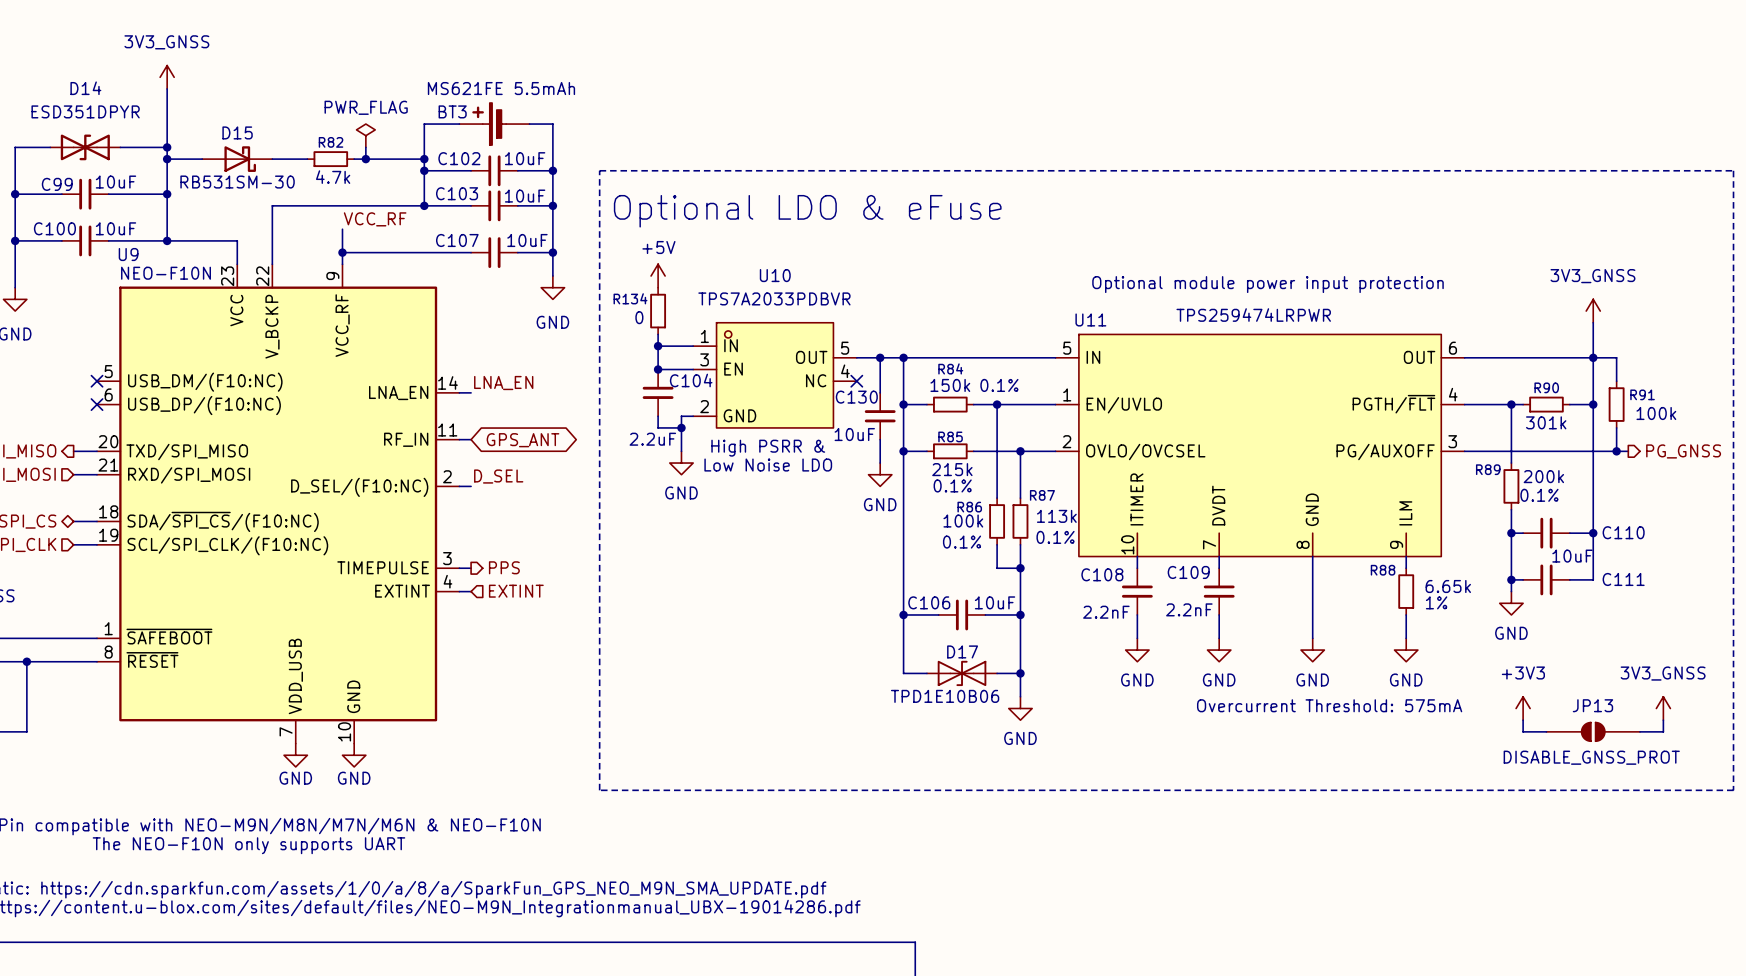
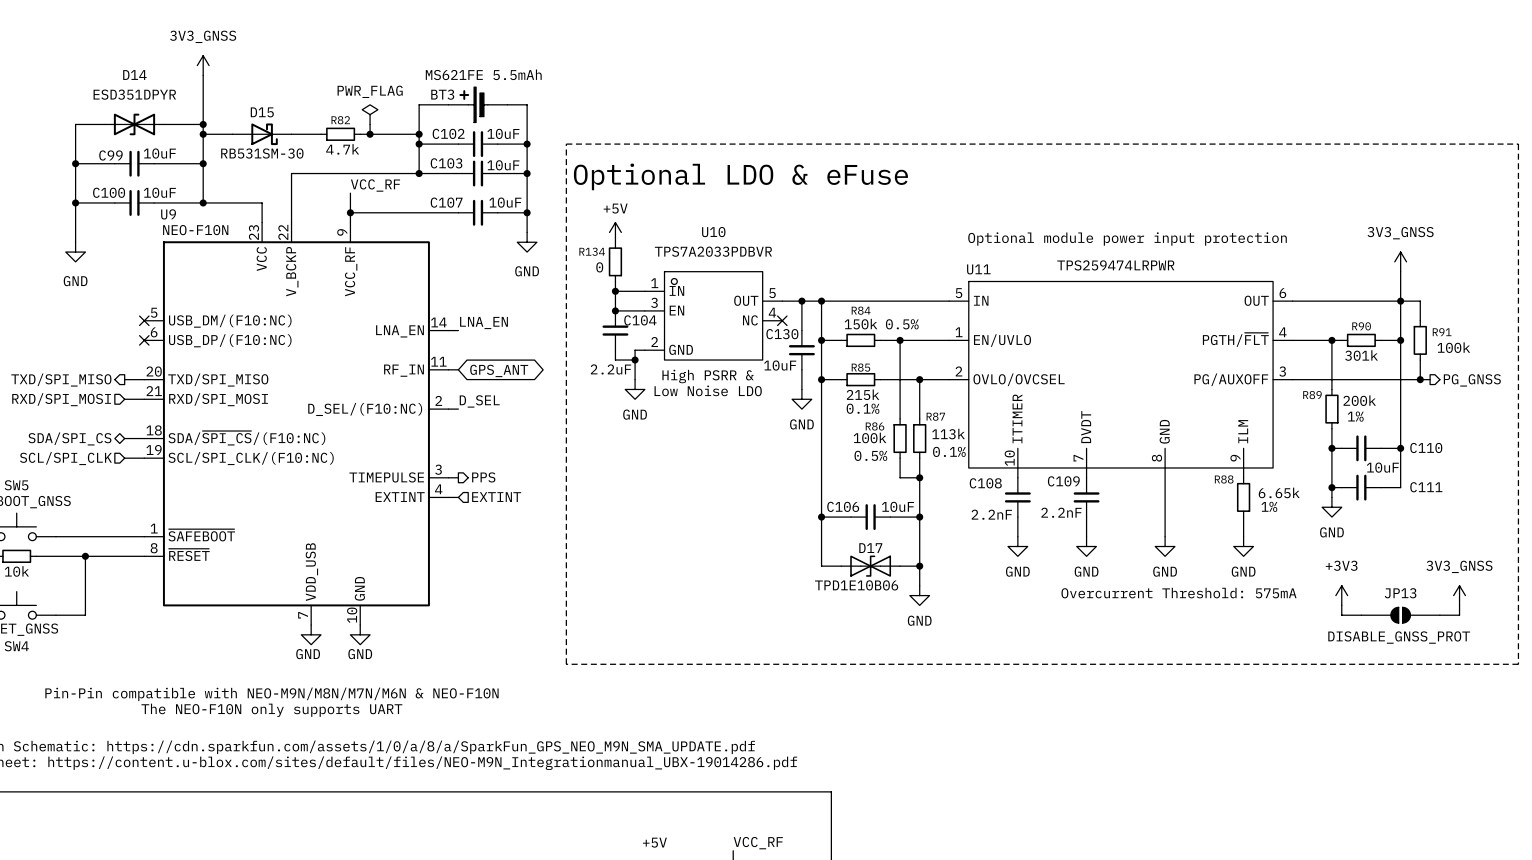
R84 text: 0.1% (999, 385) -> 0.5% (902, 324)
R89 text: 0.1% (1539, 495) -> 1% (1355, 416)
R86 text: 0.1% (962, 542) -> 0.5% (870, 455)

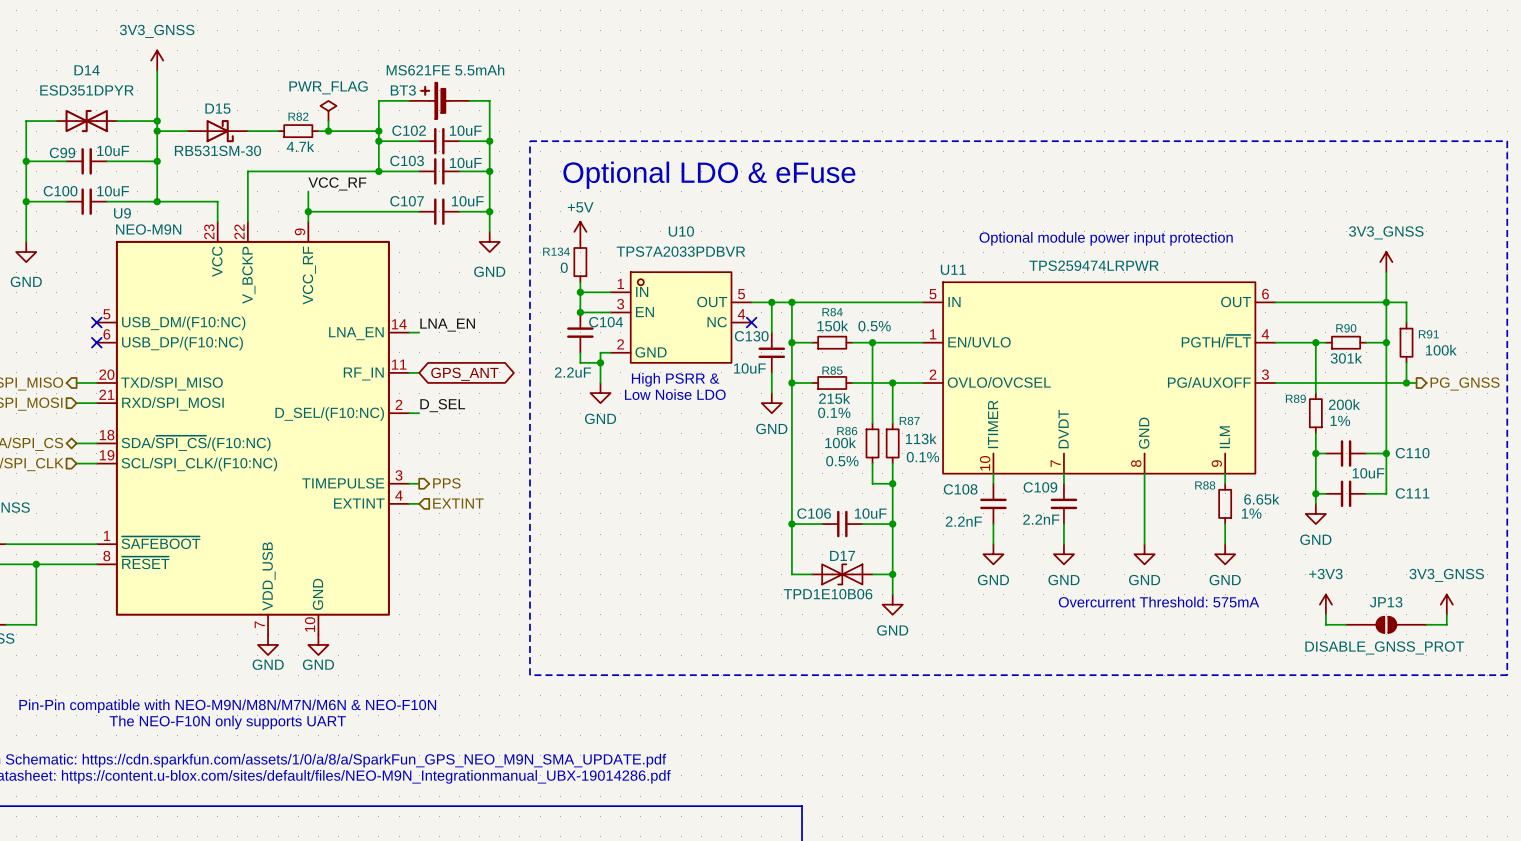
U9 value: NEO-F10N (195, 230) -> NEO-M9N (148, 229)

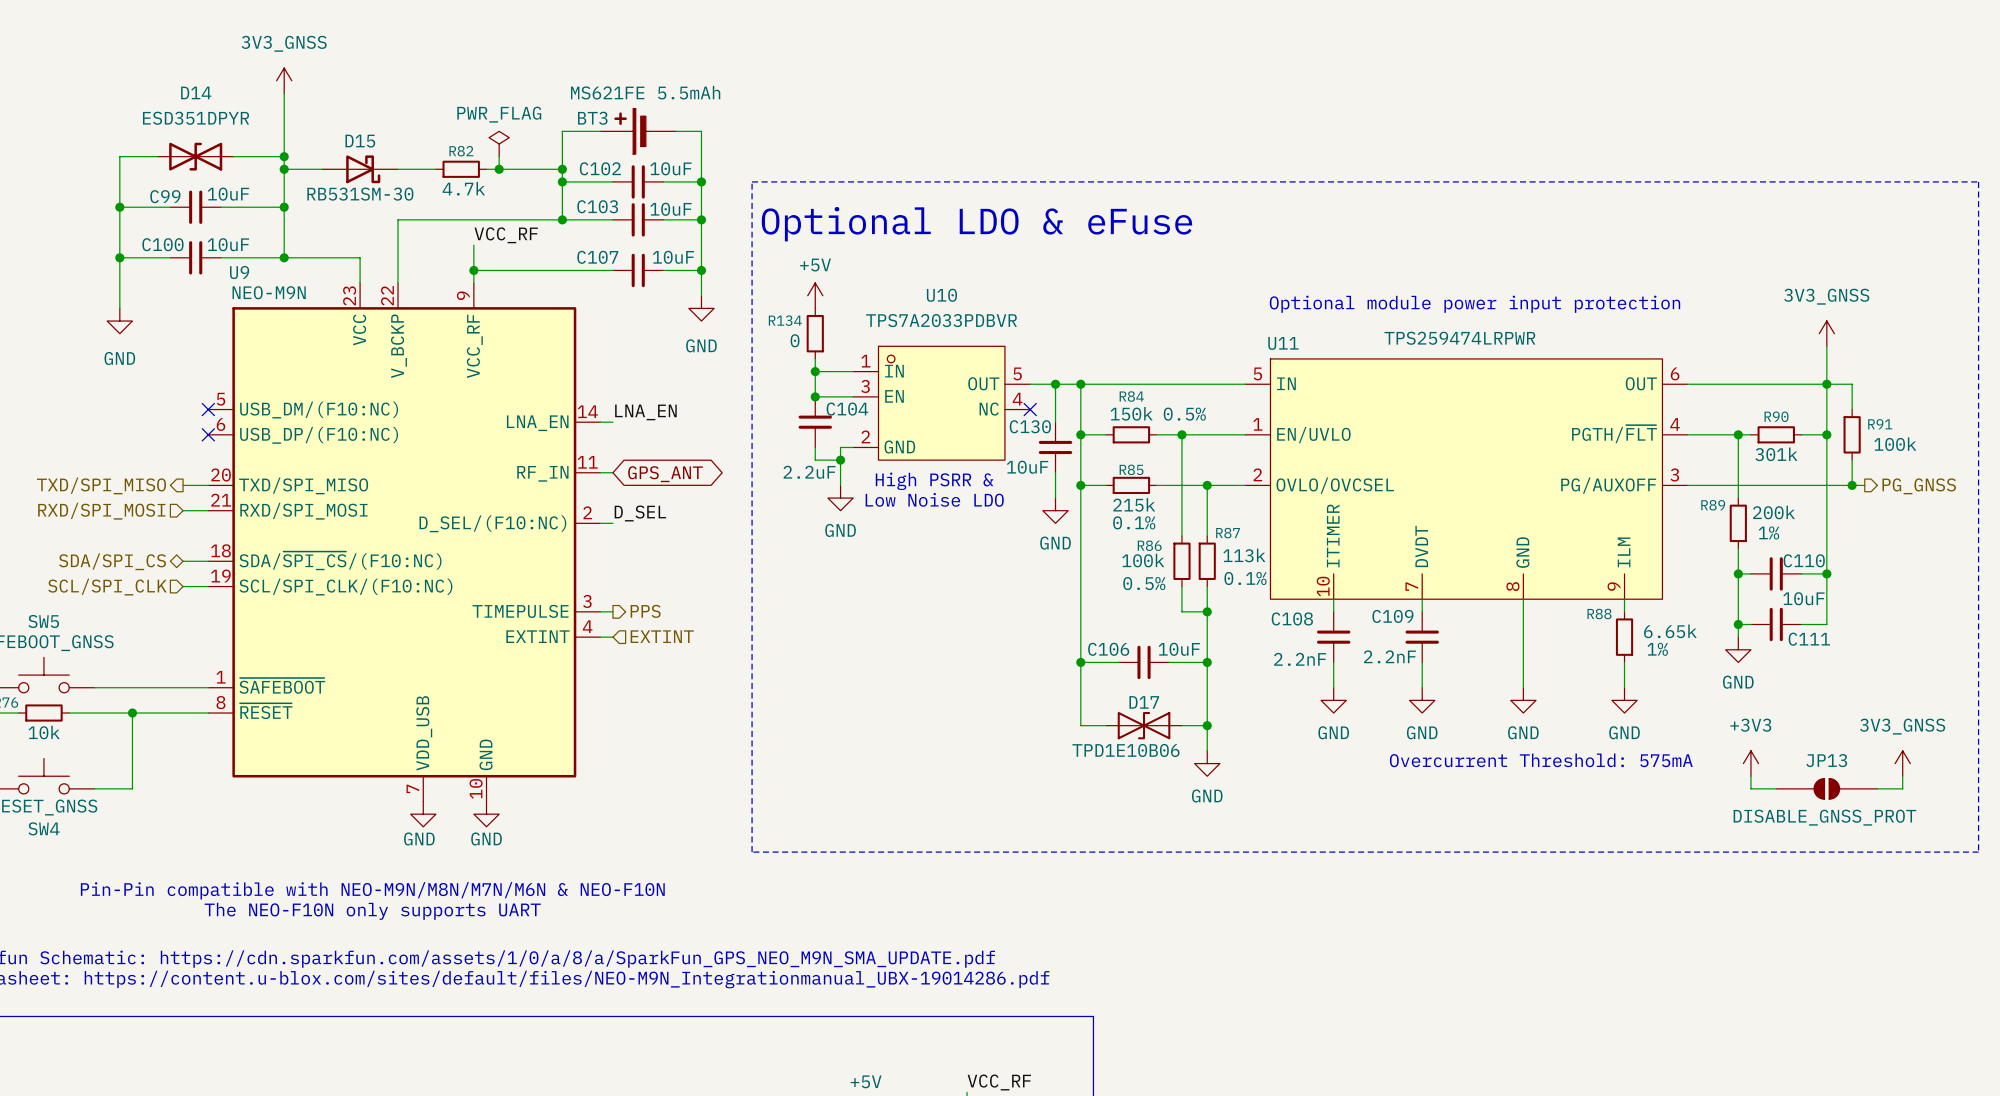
C110 name position: C110 (1412, 453) -> C110 (1804, 560)
C111 name position: C111 (1412, 493) -> C111 (1809, 639)

